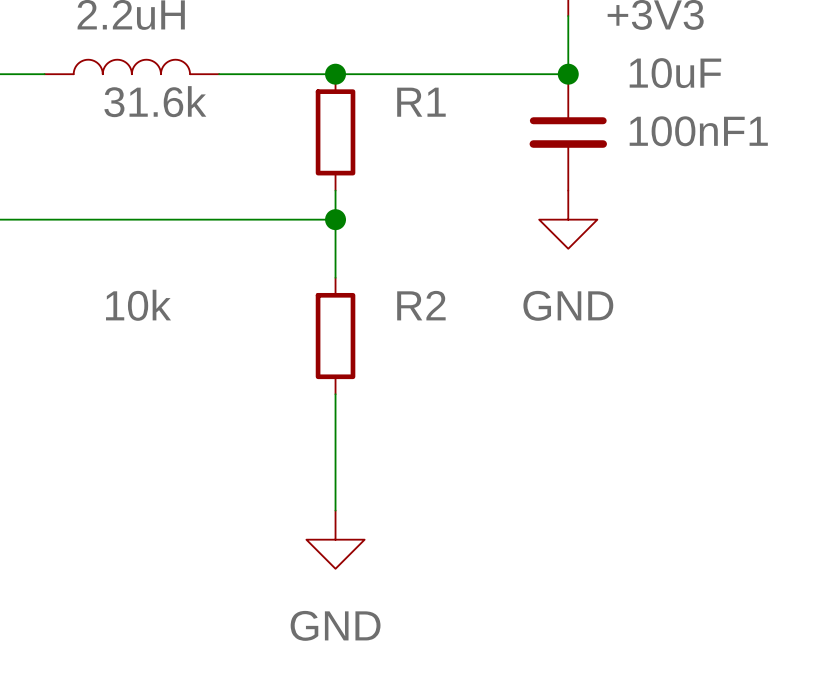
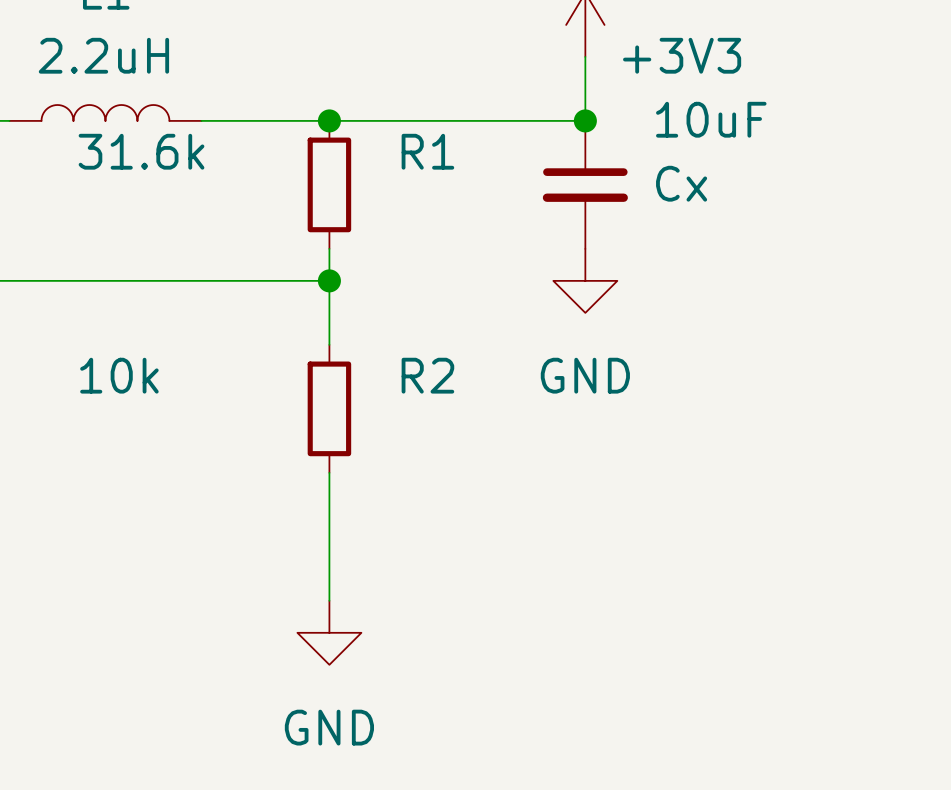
100nF1 name: 100nF1 (698, 131) -> Cx (681, 183)

